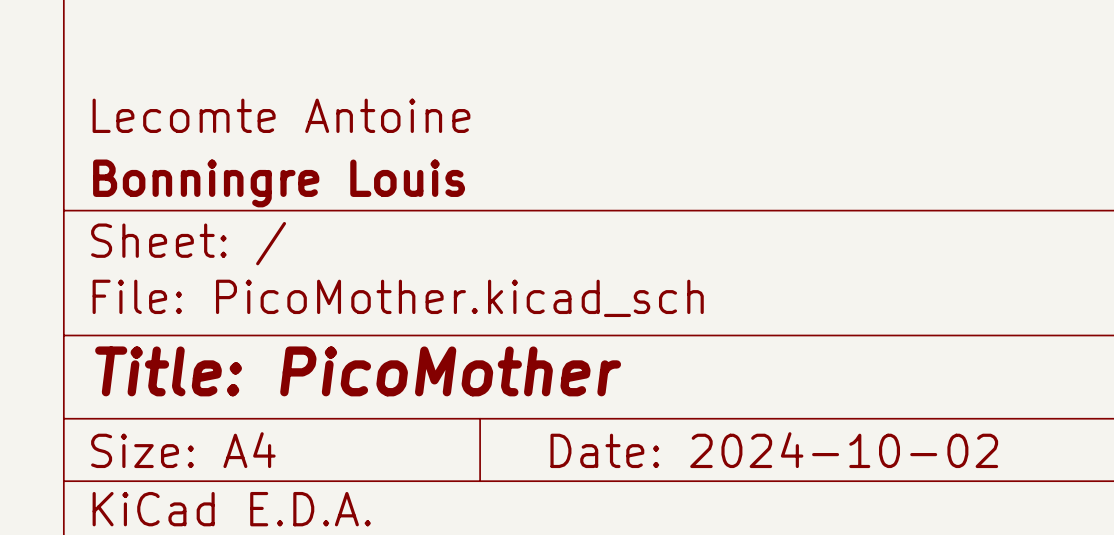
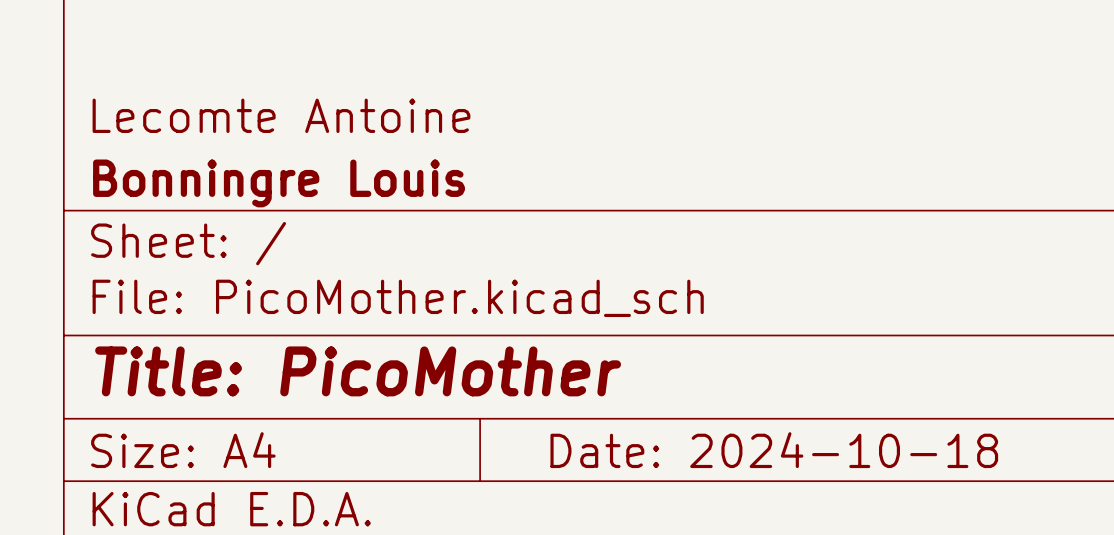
title block: Date: 2024-10-02 (774, 450) -> Date: 2024-10-18 (774, 450)

